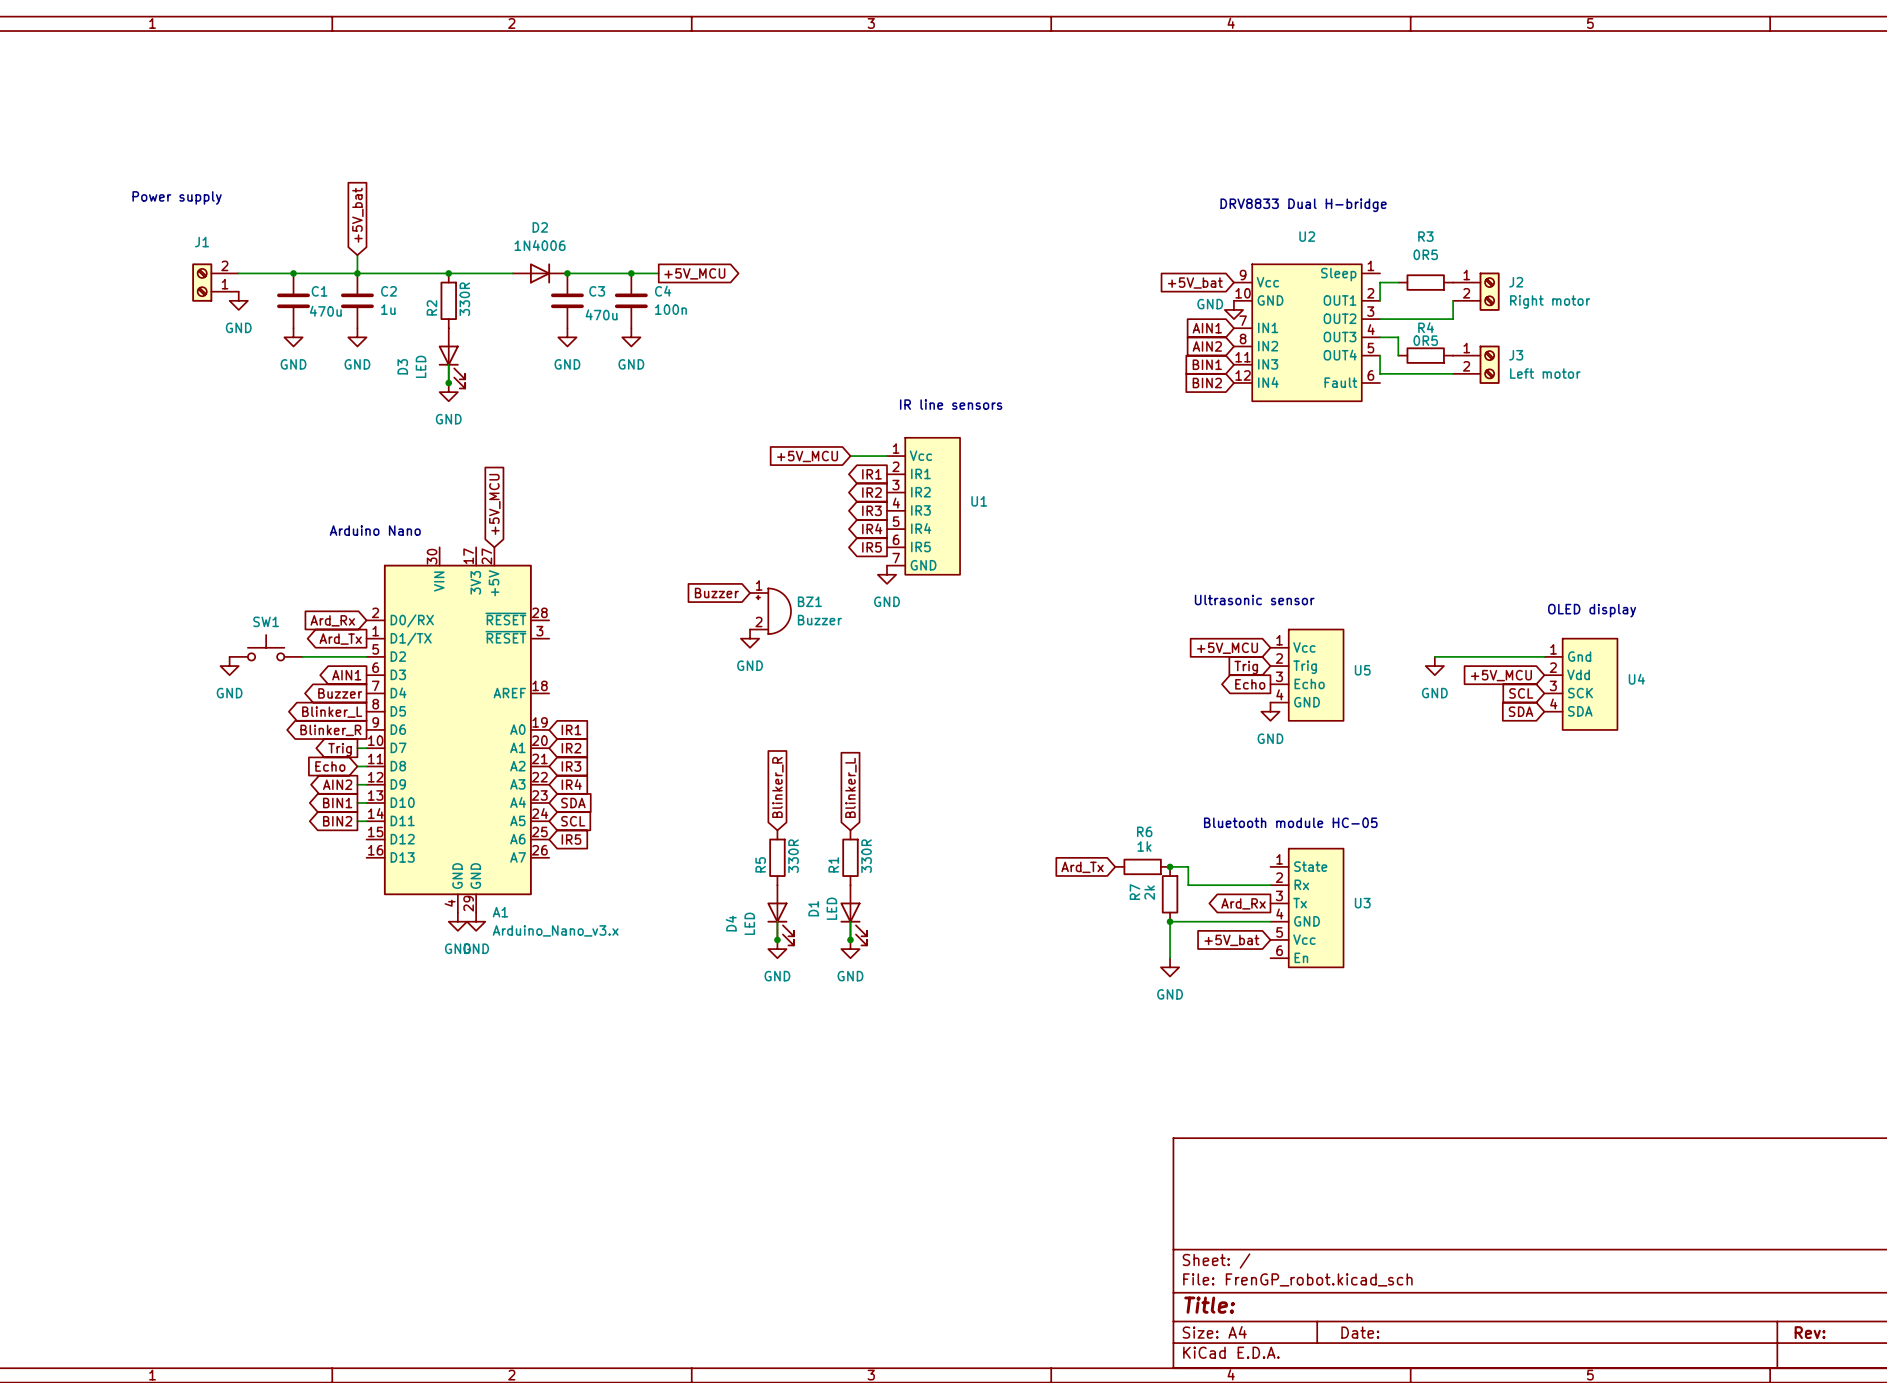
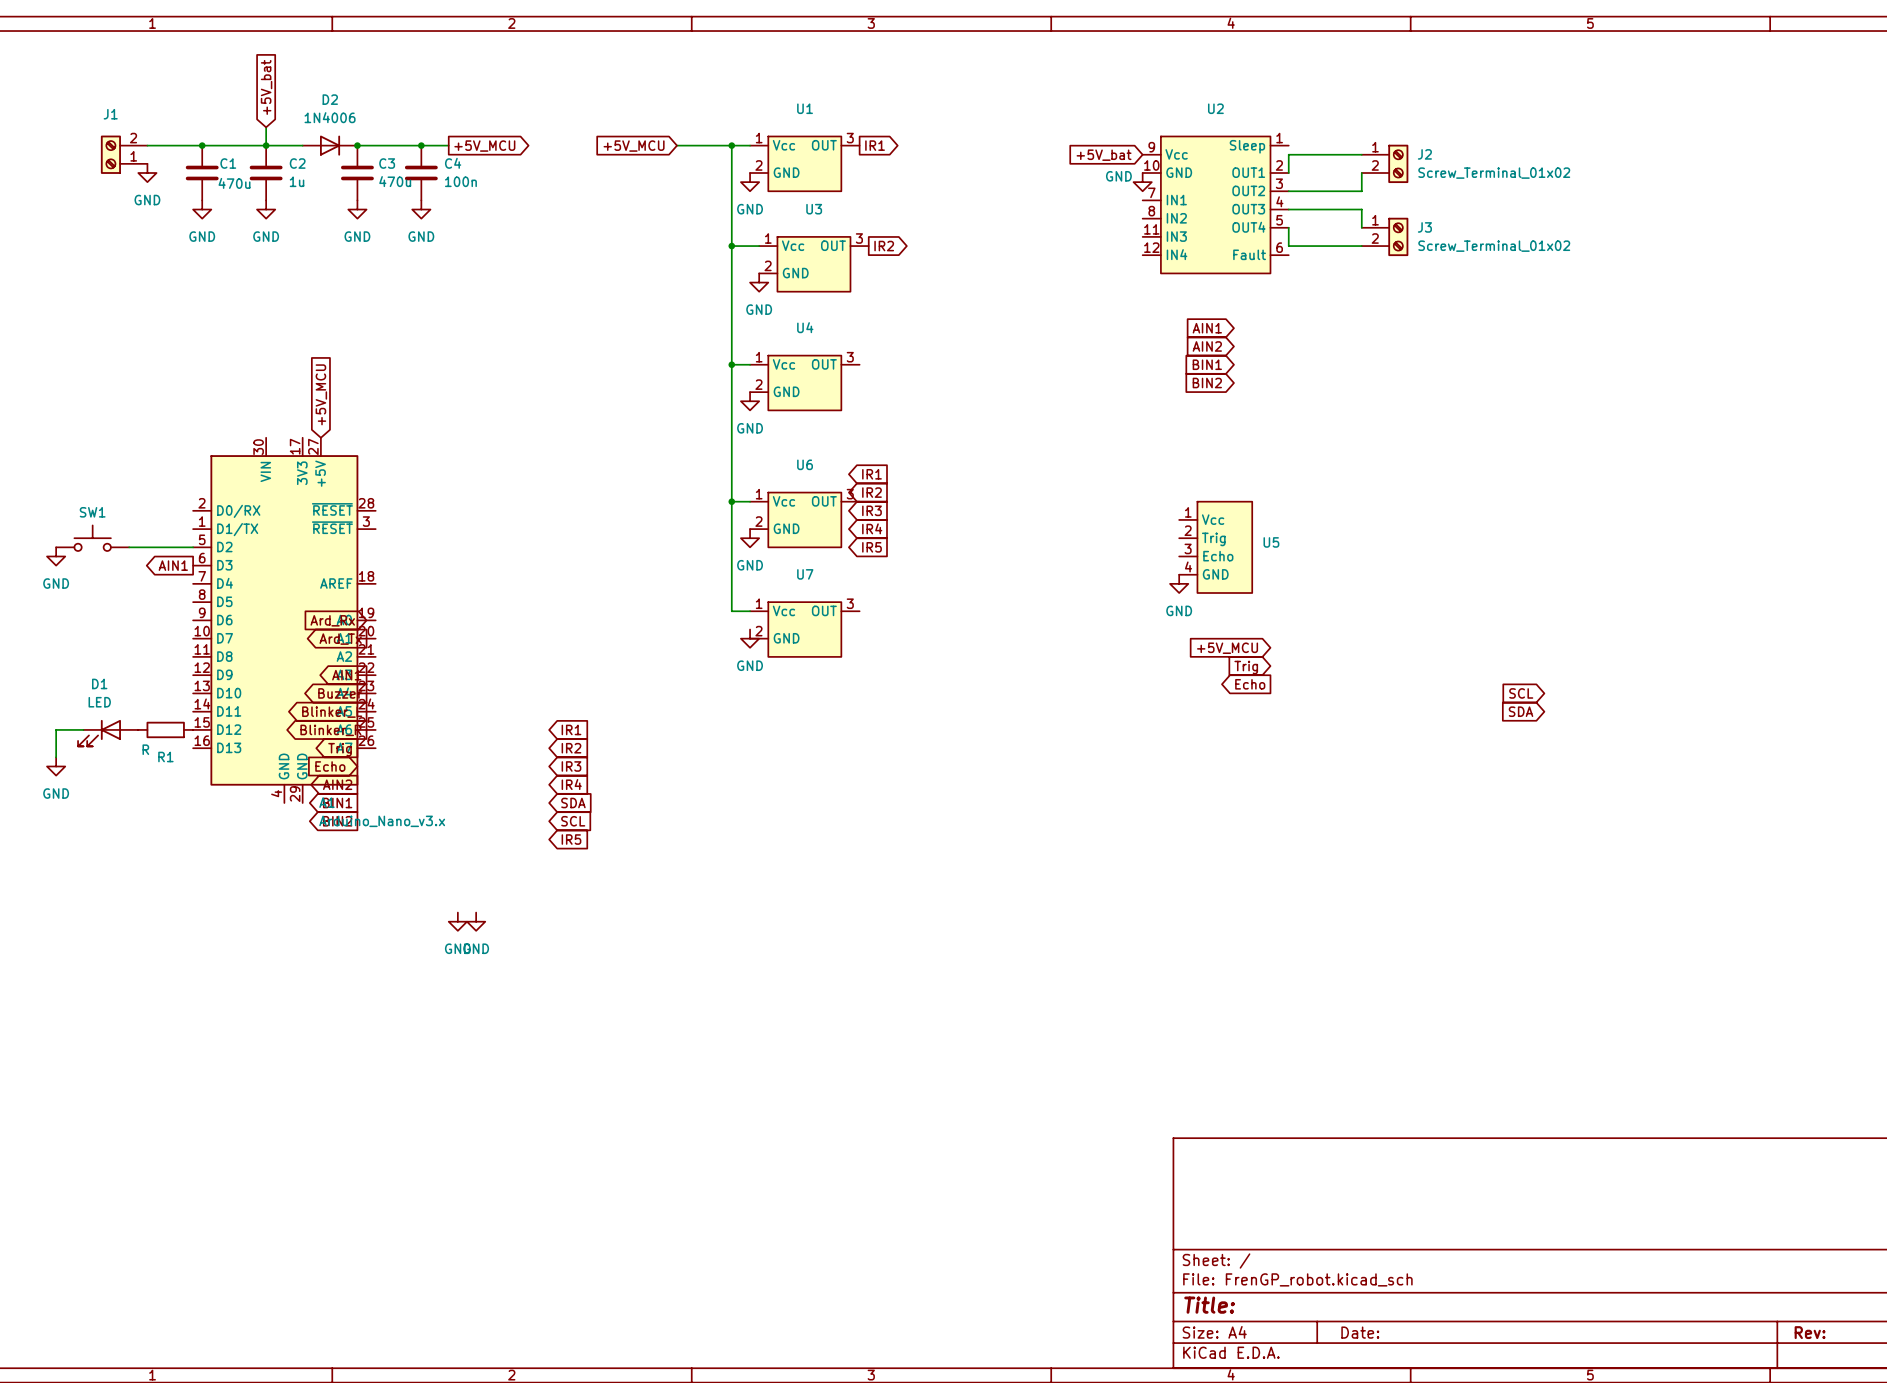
wire: none -> (147, 145) (302, 145)
junction: none -> (202, 145)
junction: none -> (266, 145)
wire: none -> (357, 145) (448, 145)
junction: none -> (357, 145)
junction: none -> (421, 145)
wire: none -> (677, 145) (750, 145)
wire: none -> (731, 145) (731, 611) (750, 611)
junction: none -> (731, 145)
global label: none -> IR1 (875, 145)
global label: none -> +5V_MCU (484, 146)
global label: none -> +5V_MCU (634, 146)
wire: none -> (1361, 154) (1288, 154) (1288, 173)
power symbol: none -> GND (147, 173)
power symbol: none -> GND (750, 182)
power symbol: none -> GND (1142, 182)
text: Power supply (177, 197) -> none
text: DRV8833 Dual H-bridge (1303, 205) -> none
power symbol: none -> GND (202, 209)
power symbol: none -> GND (266, 209)
power symbol: none -> GND (357, 209)
power symbol: none -> GND (421, 209)
wire: none -> (1288, 209) (1361, 209) (1361, 227)
global label position: +5V_bat (357, 215) -> +5V_bat (266, 87)
wire: none -> (731, 246) (759, 246)
junction: none -> (731, 246)
global label: none -> IR2 (884, 246)
wire: (357, 255) (357, 273) -> (266, 127) (266, 145)
wire: (238, 273) (512, 273) -> none
junction: (293, 273) -> none
junction: (357, 273) -> none
junction: (448, 273) -> none
D2 position: (540, 273) -> (330, 145)
wire: (567, 273) (658, 273) -> none
junction: (567, 273) -> none
junction: (631, 273) -> none
global label: +5V_MCU (694, 273) -> none
J1 position: (215, 282) -> (124, 154)
power symbol: none -> GND (759, 282)
wire: (1398, 282) (1380, 282) (1380, 300) -> none
R3: 0R5 (1425, 282) -> none
global label position: +5V_bat (1195, 283) -> +5V_bat (1104, 155)
J2 position: (1476, 291) -> (1385, 163)
power symbol: GND (238, 300) -> none
C1 position: (293, 300) -> (202, 173)
C2 position: (357, 300) -> (266, 173)
R2: 330R (448, 300) -> none
C3 position: (567, 300) -> (357, 173)
C4 position: (631, 300) -> (421, 173)
wire: (1453, 300) (1453, 319) (1380, 319) -> (1361, 173) (1361, 191) (1288, 191)
J2 value: Right motor (1550, 302) -> Screw_Terminal_01x02 (1494, 173)
power symbol: GND (1233, 309) -> none
C3 value position: 470u (601, 314) -> 470u (395, 181)
U2 position: (1307, 332) -> (1215, 204)
power symbol: GND (293, 337) -> none
power symbol: GND (357, 337) -> none
power symbol: GND (567, 337) -> none
power symbol: GND (631, 337) -> none
wire: (1380, 337) (1398, 337) (1398, 355) -> none
wire: (1380, 355) (1380, 373) (1453, 373) -> (1288, 227) (1288, 246) (1361, 246)
R4: 0R5 (1425, 355) -> none
D3: LED (451, 358) -> none
wire: (448, 364) (448, 383) -> none
wire: none -> (731, 364) (750, 364)
junction: none -> (731, 364)
J3 position: (1476, 364) -> (1385, 236)
J3 value: Left motor (1545, 373) -> Screw_Terminal_01x02 (1494, 246)
junction: (448, 383) -> none
power symbol: GND (448, 392) -> none
global label: none -> +5V_MCU (321, 394)
power symbol: none -> GND (750, 401)
text: IR line sensors (951, 404) -> none
U1 symbol: [887, 437, 961, 575] -> [750, 136, 860, 192]
global label: +5V_MCU (807, 456) -> none
wire: (850, 456) (887, 456) -> none
wire: none -> (731, 501) (750, 501)
junction: none -> (731, 501)
U1 name position: U1 (979, 501) -> U1 (805, 108)
global label: +5V_MCU (494, 504) -> none
U6: none -> (804, 519)
text: Arduino Nano (375, 530) -> none
power symbol: none -> GND (750, 538)
wire: none -> (129, 547) (193, 547)
power symbol: none -> GND (56, 556)
global label: none -> AIN1 (173, 565)
power symbol: GND (887, 574) -> none
power symbol: none -> GND (1179, 583)
global label: Buzzer (716, 593) -> none
text: Ultrasonic sensor (1254, 599) -> none
text: OLED display (1592, 610) -> none
BZ1: Buzzer (770, 611) -> none
U7: none -> (804, 629)
U4 symbol: [1544, 638, 1618, 730] -> [750, 355, 860, 411]
SW1 position: (266, 647) -> (92, 538)
wire: (1434, 656) (1544, 656) -> none
power symbol: GND (229, 666) -> none
power symbol: GND (1434, 666) -> none
U5 position: (1307, 675) -> (1215, 547)
global label: +5V_MCU (1501, 675) -> none
U4 name position: U4 (1636, 679) -> U4 (805, 327)
power symbol: GND (1270, 711) -> none
wire: none -> (83, 729) (56, 729) (56, 757)
A1 position: (457, 729) -> (284, 620)
power symbol: none -> GND (56, 766)
wire: (357, 766) (366, 766) -> none
wire: (357, 784) (366, 784) -> none
global label: Blinker_R (777, 787) -> none
global label: Blinker_L (850, 787) -> none
wire: (357, 803) (366, 803) -> none
wire: (357, 821) (366, 821) -> none
text: Bluetooth module HC-05 (1290, 822) -> none
U3 symbol: [1270, 848, 1344, 968] -> [759, 236, 869, 292]
R1 value: 330R (866, 856) -> R (145, 749)
R5: 330R (777, 857) -> none
R1 rotation: 0° (850, 857) -> 90° clockwise (165, 729)
R1 position: (850, 857) -> (165, 729)
R1 name position: R1 (833, 864) -> R1 (165, 757)
R6: 1k (1142, 866) -> none
wire: (1170, 866) (1188, 866) (1188, 885) (1270, 885) -> none
junction: (1170, 866) -> none
global label: Ard_Tx (1082, 867) -> none
R7: 2k (1170, 894) -> none
global label: Ard_Rx (1243, 903) -> none
U3 name position: U3 (1362, 903) -> U3 (814, 209)
D1 name position: D1 (813, 908) -> D1 (99, 683)
D1 value position: LED (831, 908) -> LED (99, 702)
D4: LED (780, 915) -> none
D1 position: (853, 915) -> (108, 733)
wire: (777, 921) (777, 939) -> none
wire: (850, 921) (850, 939) -> none
junction: (1170, 921) -> none
wire: (1270, 921) (1170, 921) (1170, 958) -> none
D1 rotation: 0° (853, 923) -> 90° clockwise (99, 733)
junction: (777, 939) -> none
junction: (850, 939) -> none
global label: +5V_bat (1231, 940) -> none
power symbol: GND (777, 949) -> none
power symbol: GND (850, 949) -> none
power symbol: GND (1170, 967) -> none

